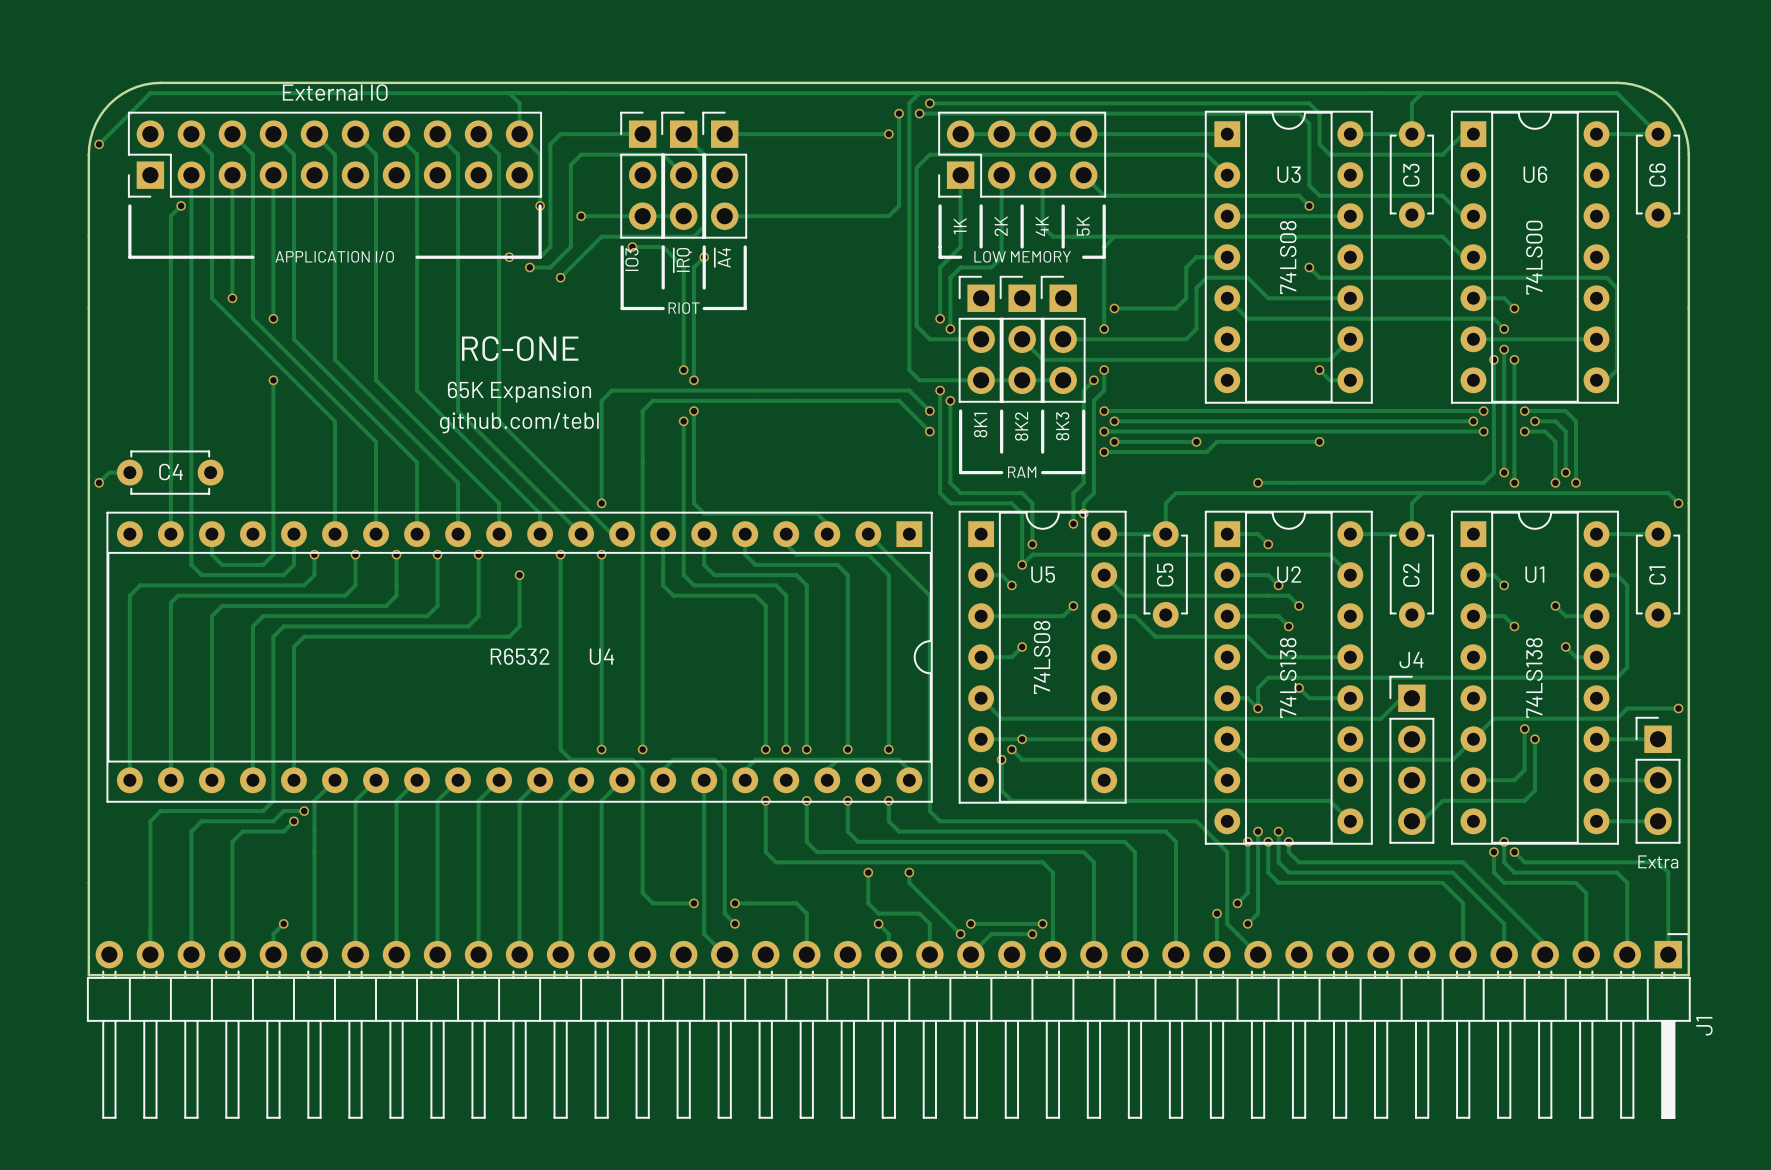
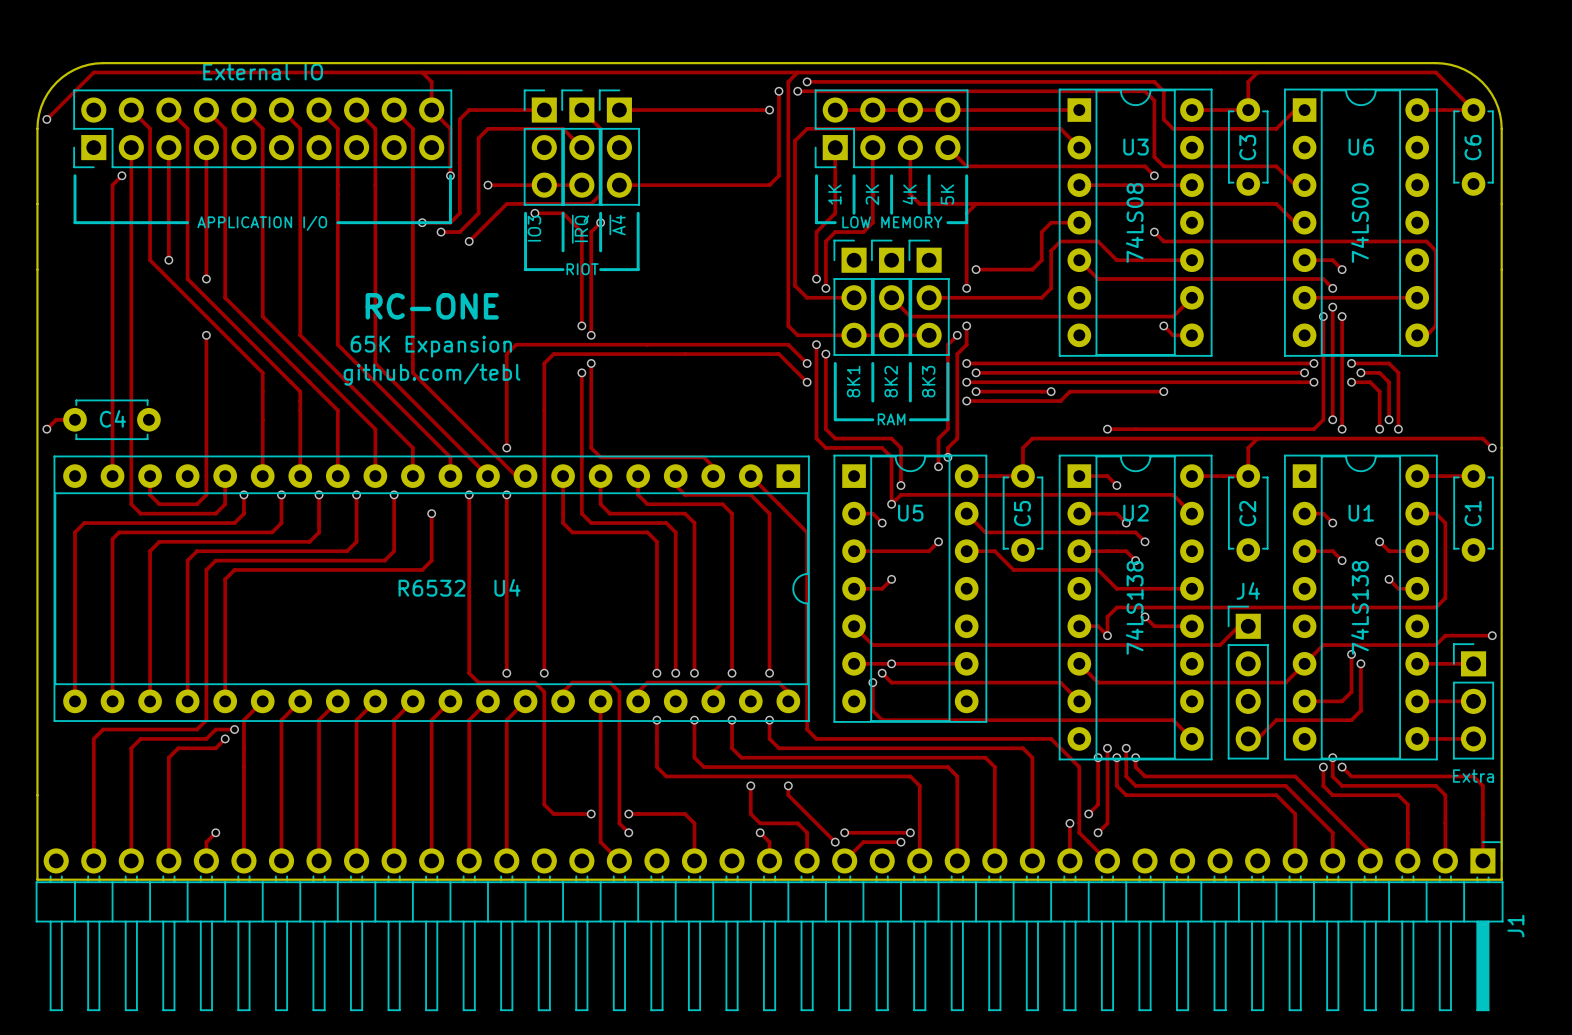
U5 value: 74LS08 (1042, 657) -> none

